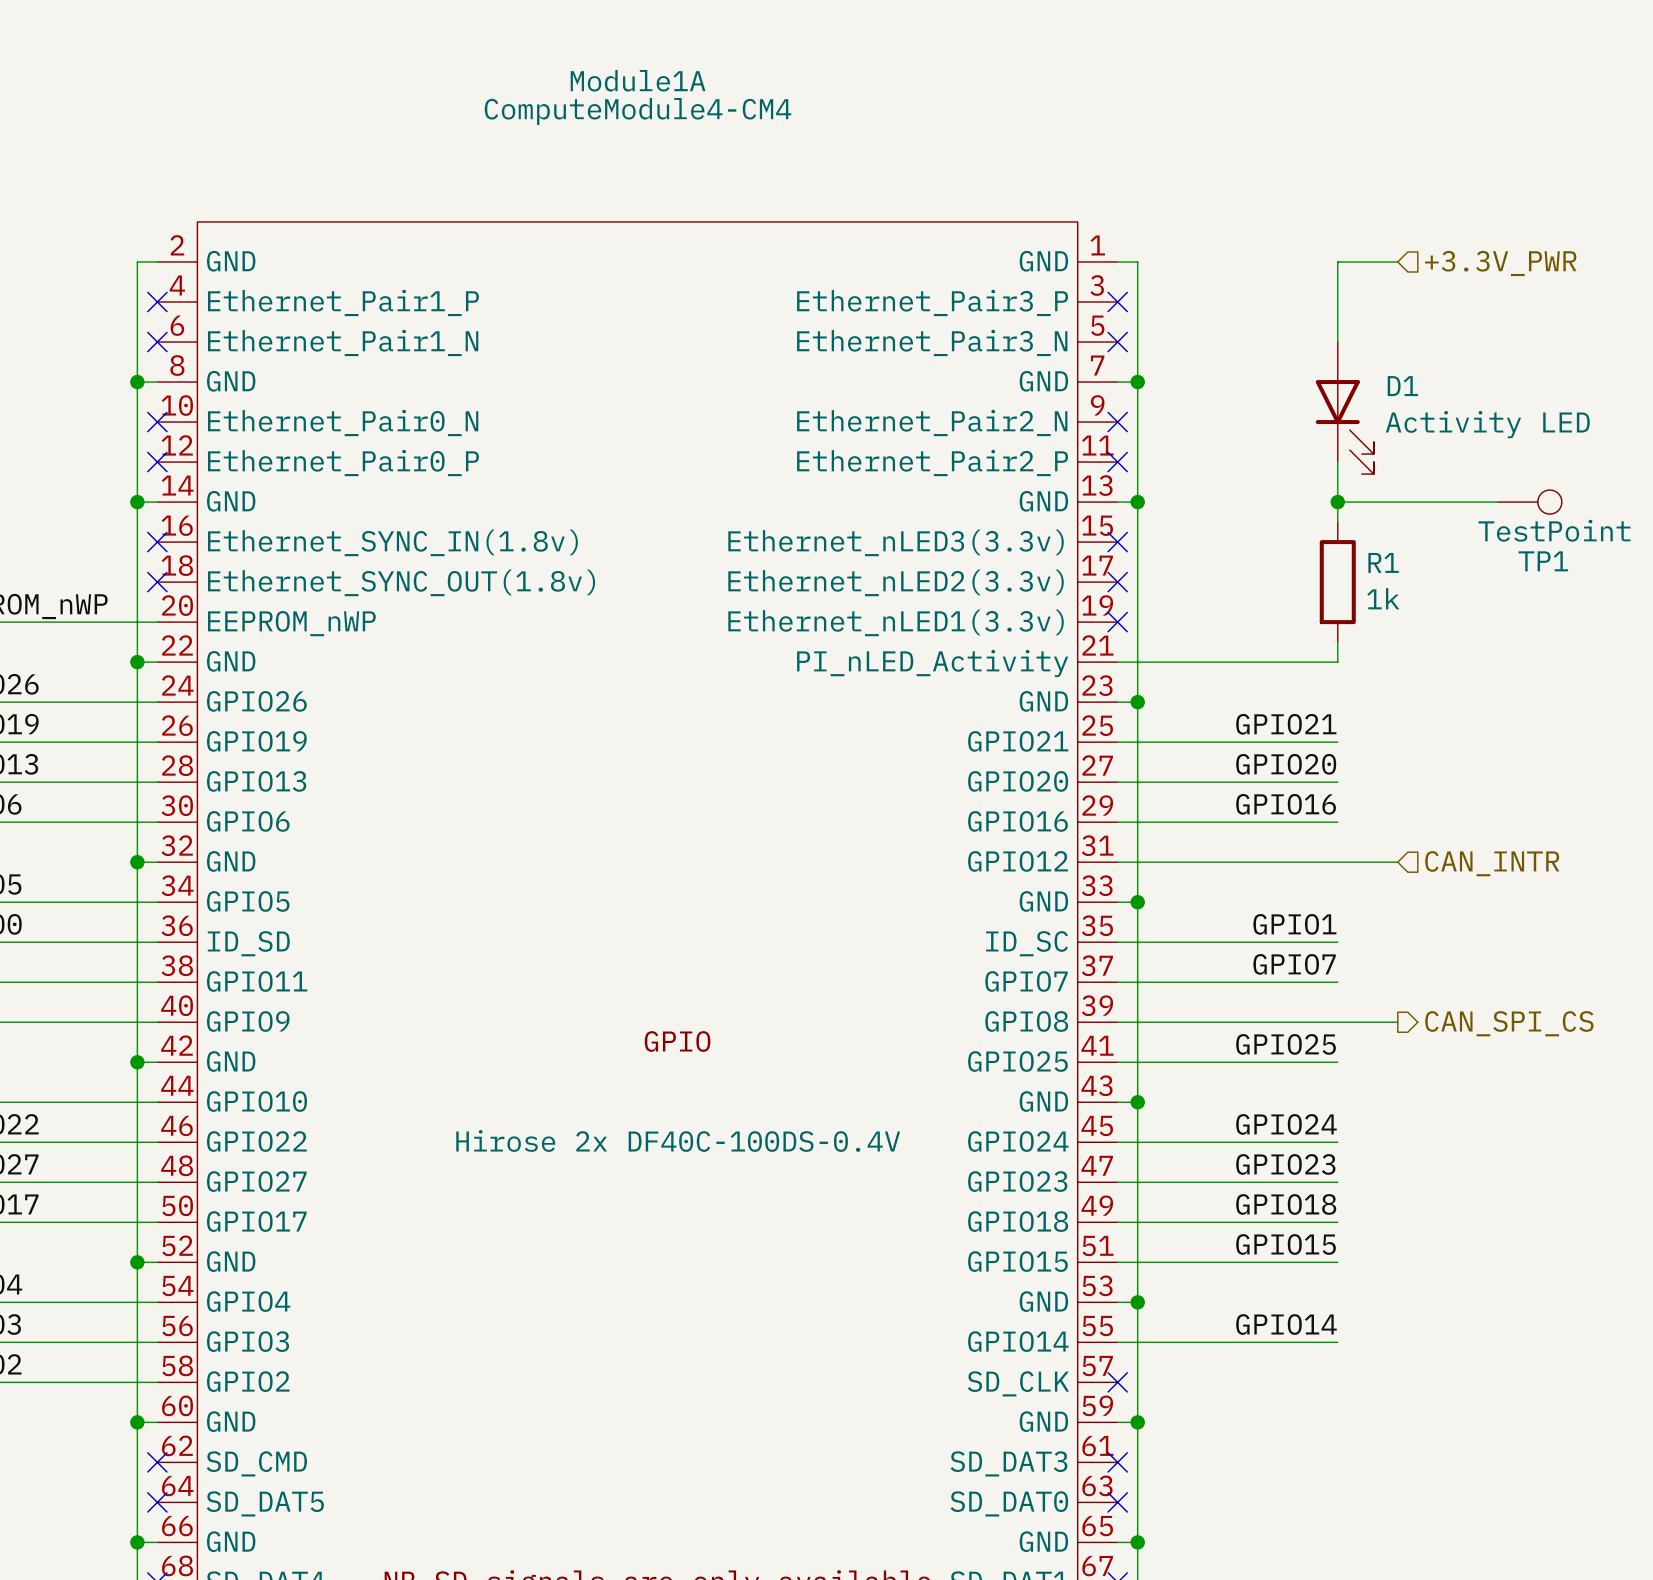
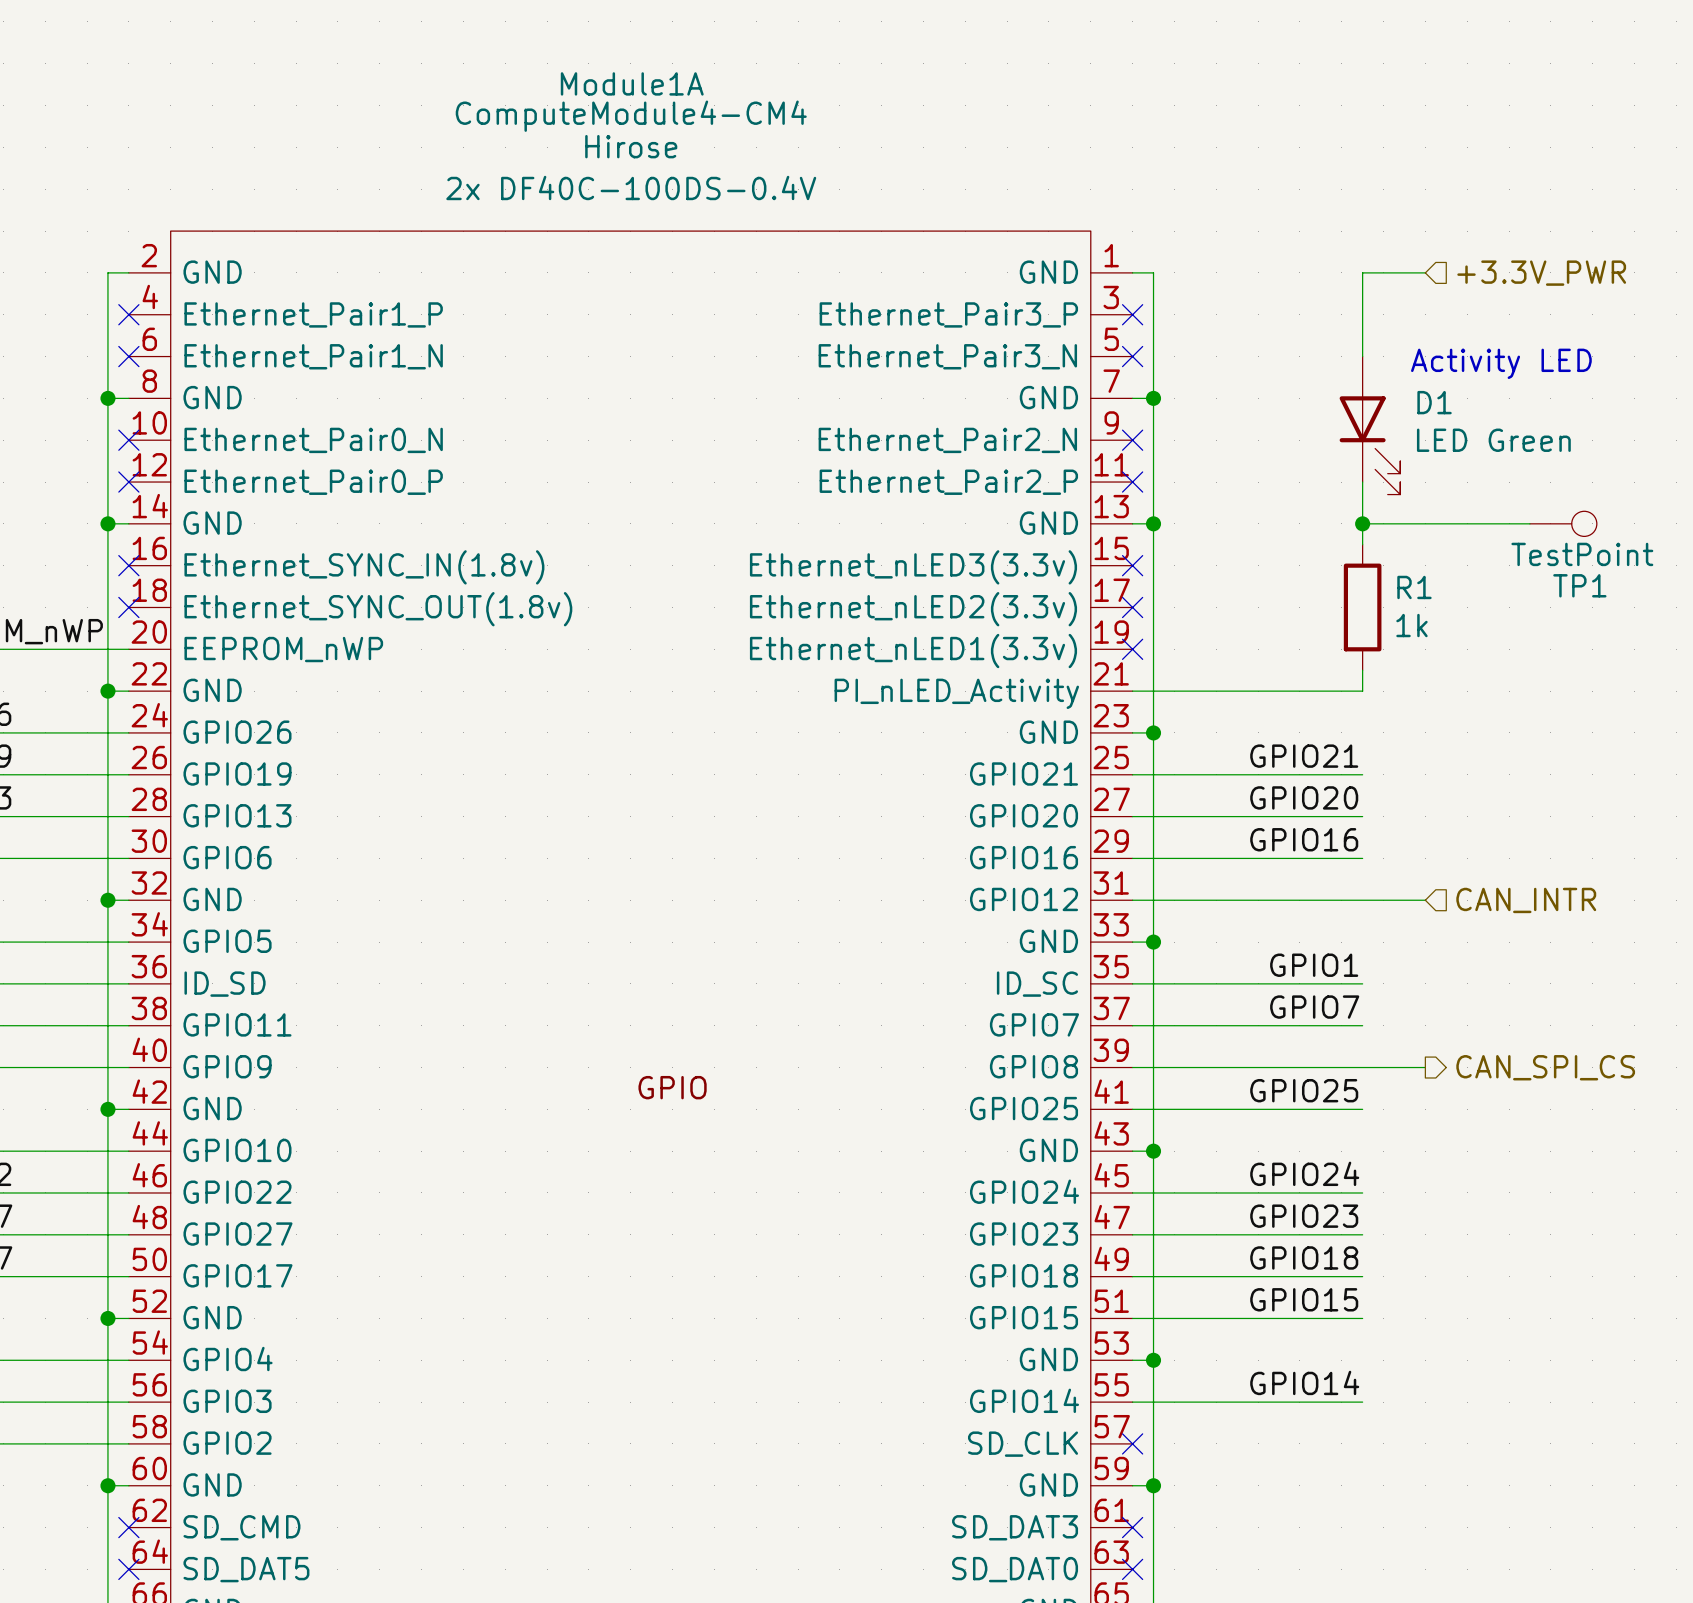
Module1A text: none -> Hirose (631, 146)
Module1A text: none -> 2x DF40C-100DS-0.4V (631, 187)
text: none -> Activity LED (1501, 363)
D1 value: Activity LED (1487, 424) -> LED Green (1493, 440)
Module1A text: Hirose 2x DF40C-100DS-0.4V (678, 1140) -> none

